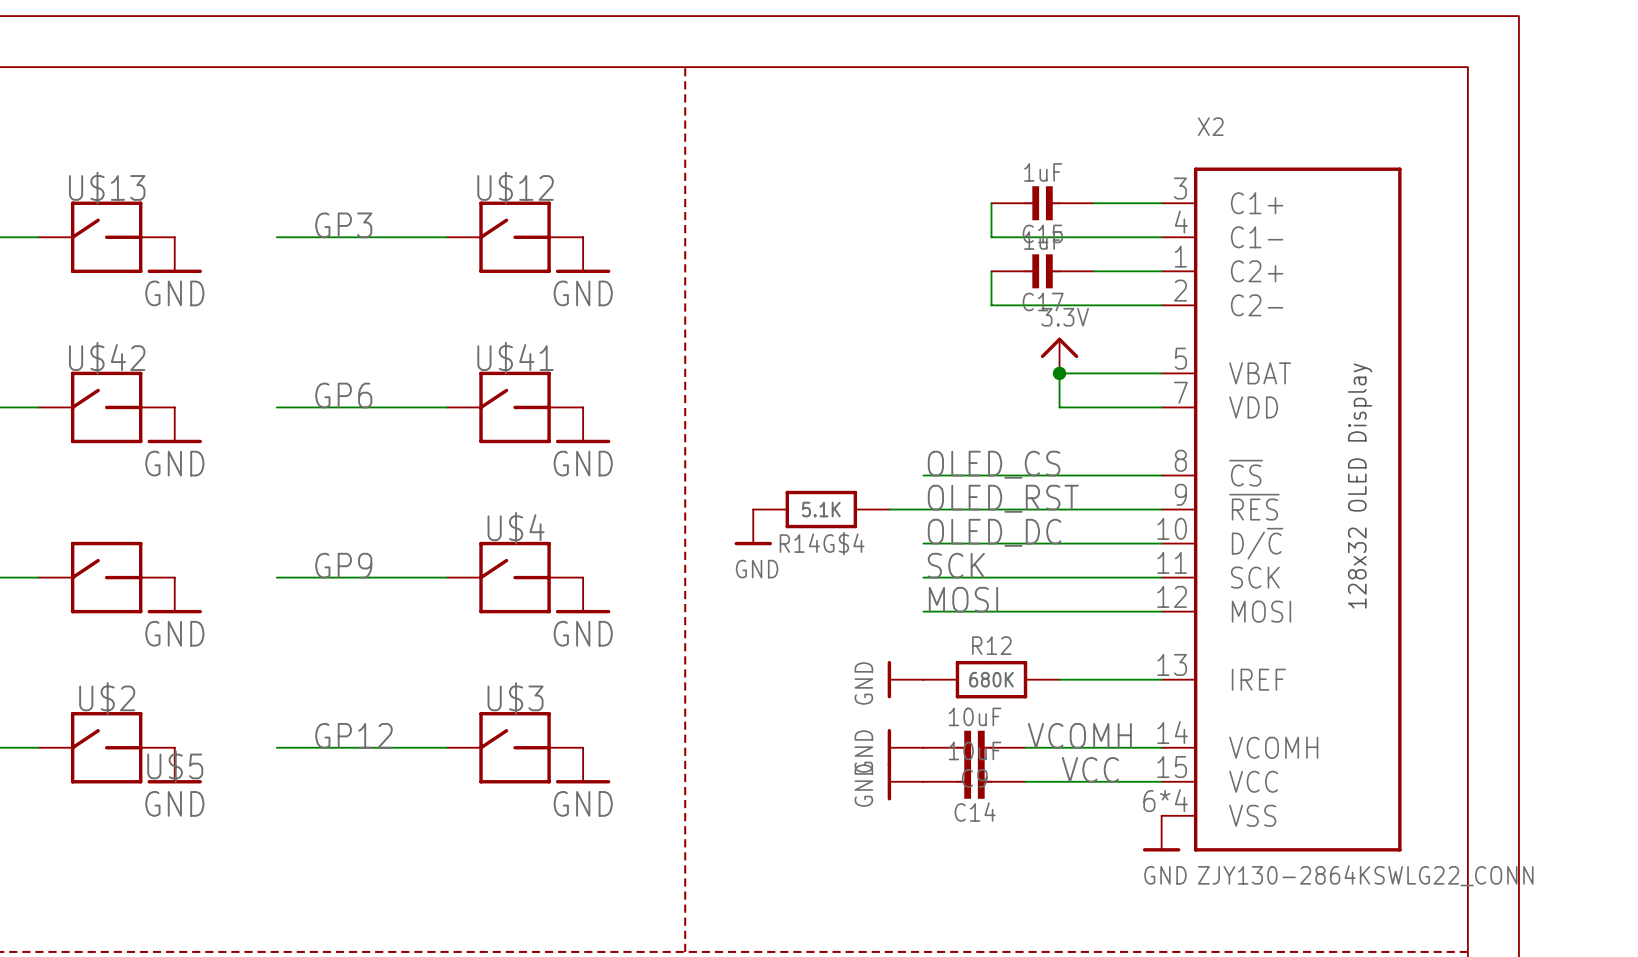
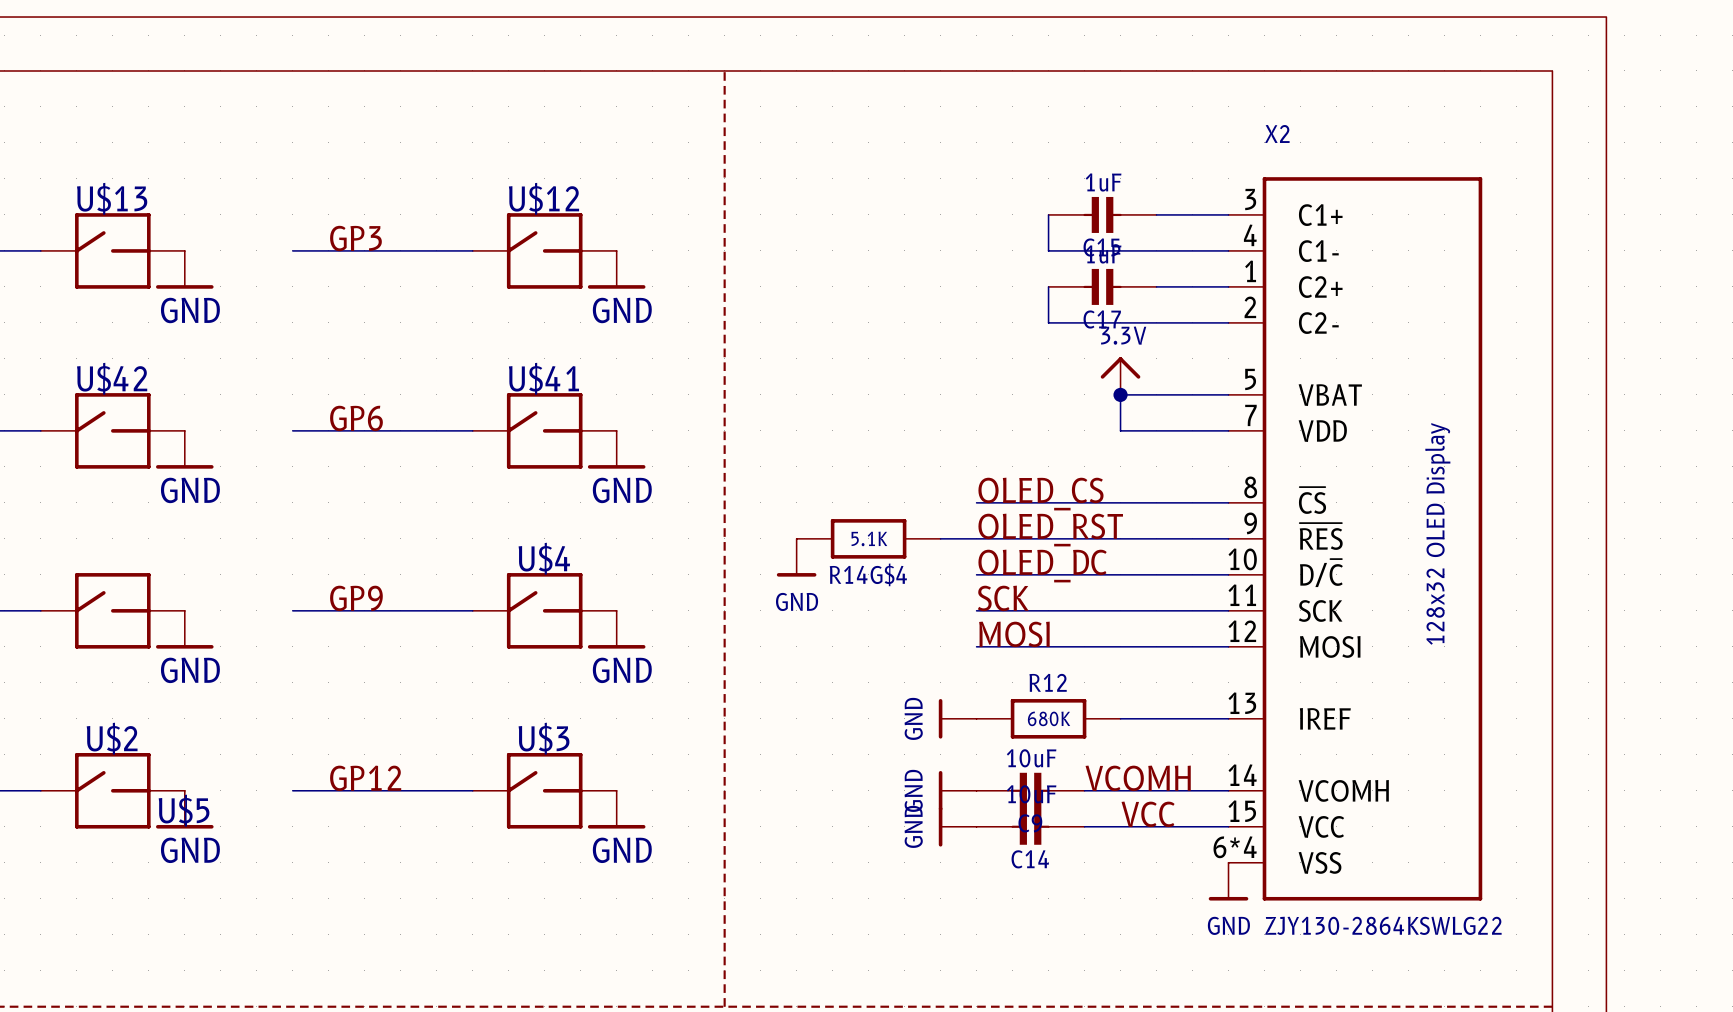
X2 value: ZJY130-2864KSWLG22_CONN (1365, 875) -> ZJY130-2864KSWLG22 (1383, 925)

